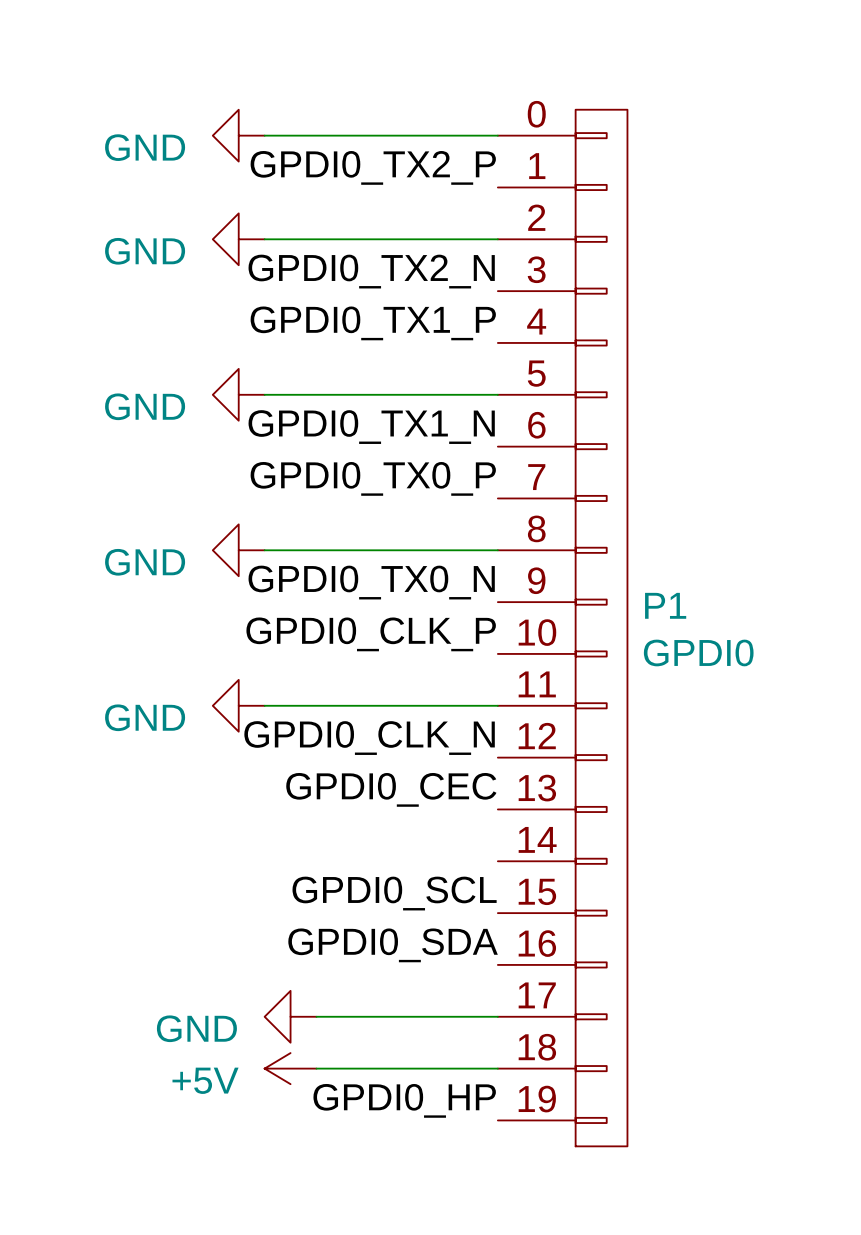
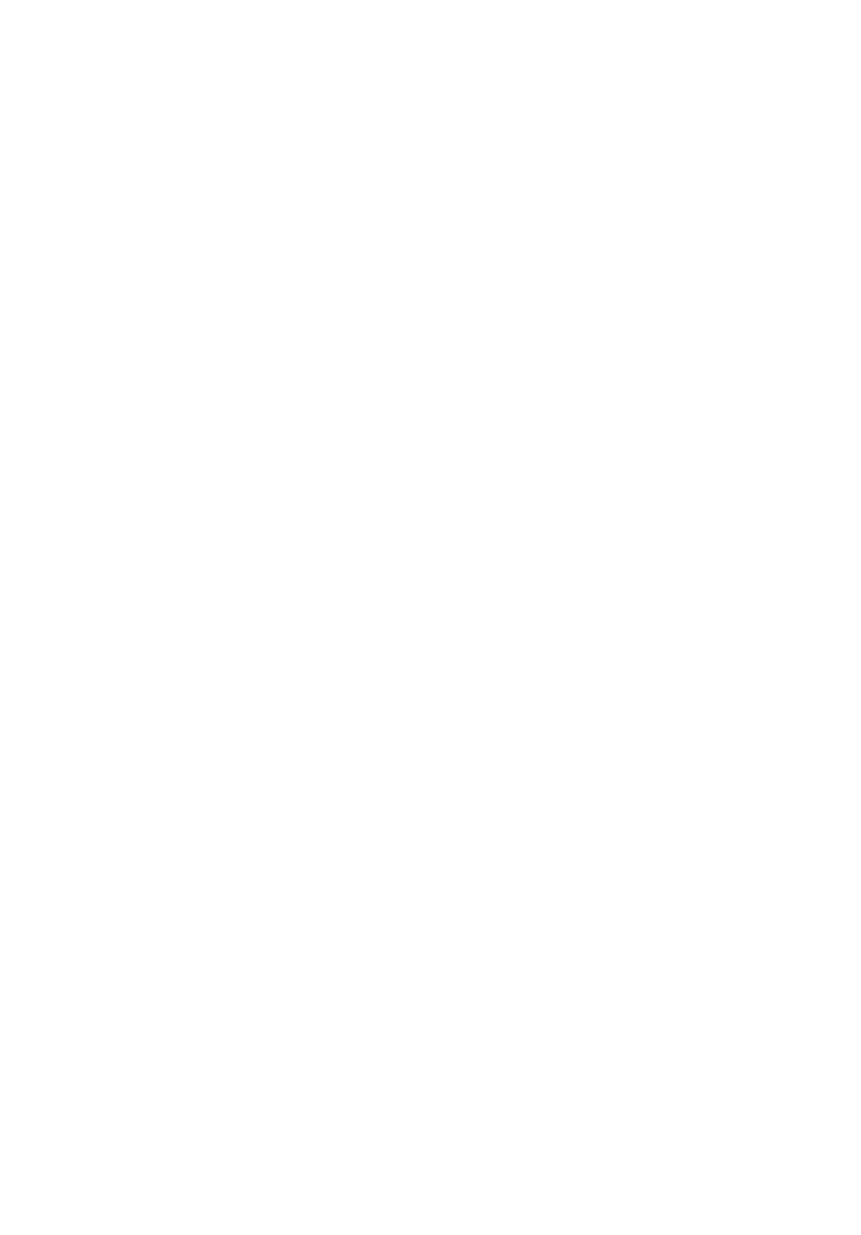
power symbol: GND (238, 135) -> none
wire: (264, 135) (497, 135) -> none
label: GPDI0_TX2_P (373, 167) -> none
power symbol: GND (238, 239) -> none
wire: (264, 239) (497, 239) -> none
label: GPDI0_TX2_N (371, 271) -> none
label: GPDI0_TX1_P (373, 323) -> none
power symbol: GND (238, 394) -> none
wire: (264, 394) (497, 394) -> none
label: GPDI0_TX1_N (371, 427) -> none
label: GPDI0_TX0_P (373, 478) -> none
power symbol: GND (238, 550) -> none
wire: (264, 550) (497, 550) -> none
label: GPDI0_TX0_N (371, 582) -> none
P1: GPDI0 (562, 628) -> none
label: GPDI0_CLK_P (371, 634) -> none
power symbol: GND (238, 705) -> none
wire: (264, 705) (497, 705) -> none
label: GPDI0_CLK_N (369, 738) -> none
label: GPDI0_CEC (391, 789) -> none
label: GPDI0_SCL (394, 893) -> none
label: GPDI0_SDA (393, 945) -> none
power symbol: GND (290, 1016) -> none
wire: (316, 1016) (497, 1016) -> none
power symbol: +5V (290, 1068) -> none
wire: (316, 1068) (497, 1068) -> none
label: GPDI0_HP (404, 1100) -> none

